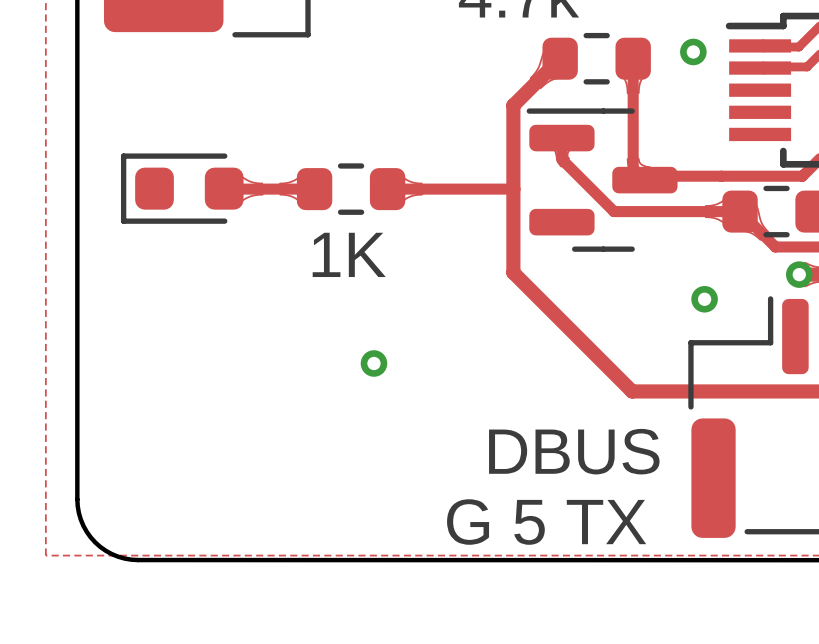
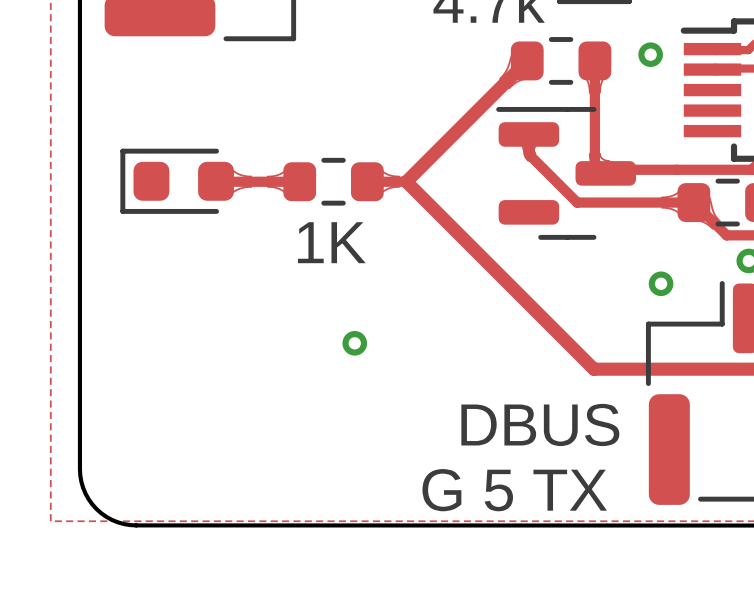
track: (513, 105) (513, 272) -> (483, 104) (406, 181) (483, 259)
track: (429, 189) (513, 189) -> none

